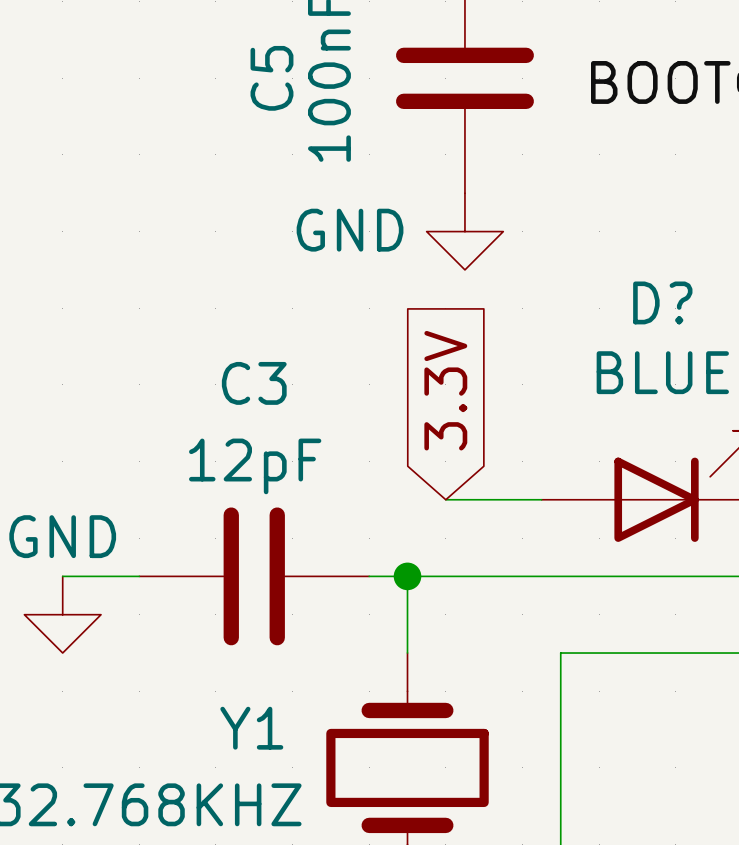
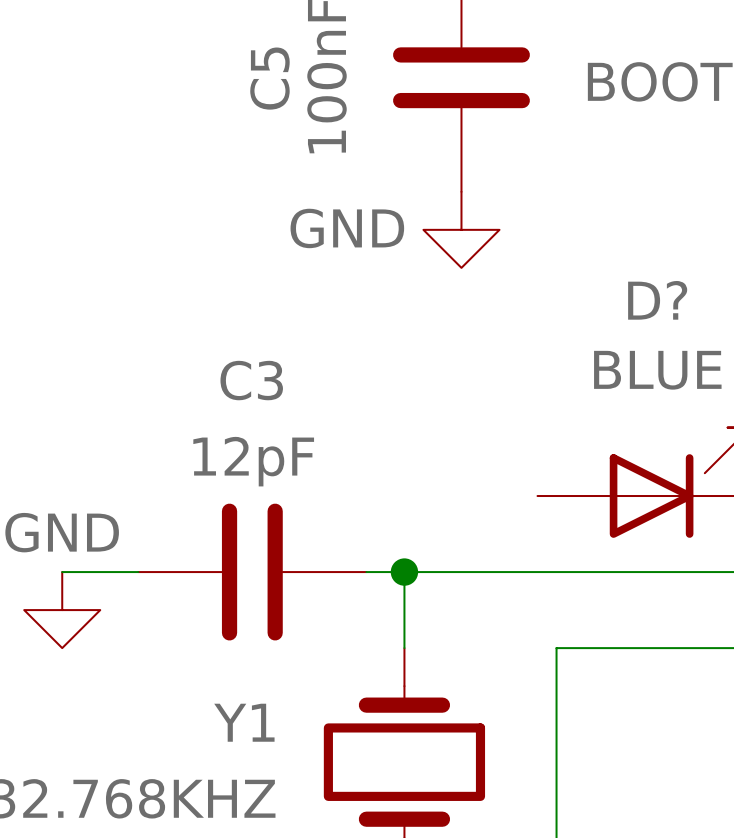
global label: 3.3V (445, 390) -> none
wire: (445, 499) (541, 499) -> none

